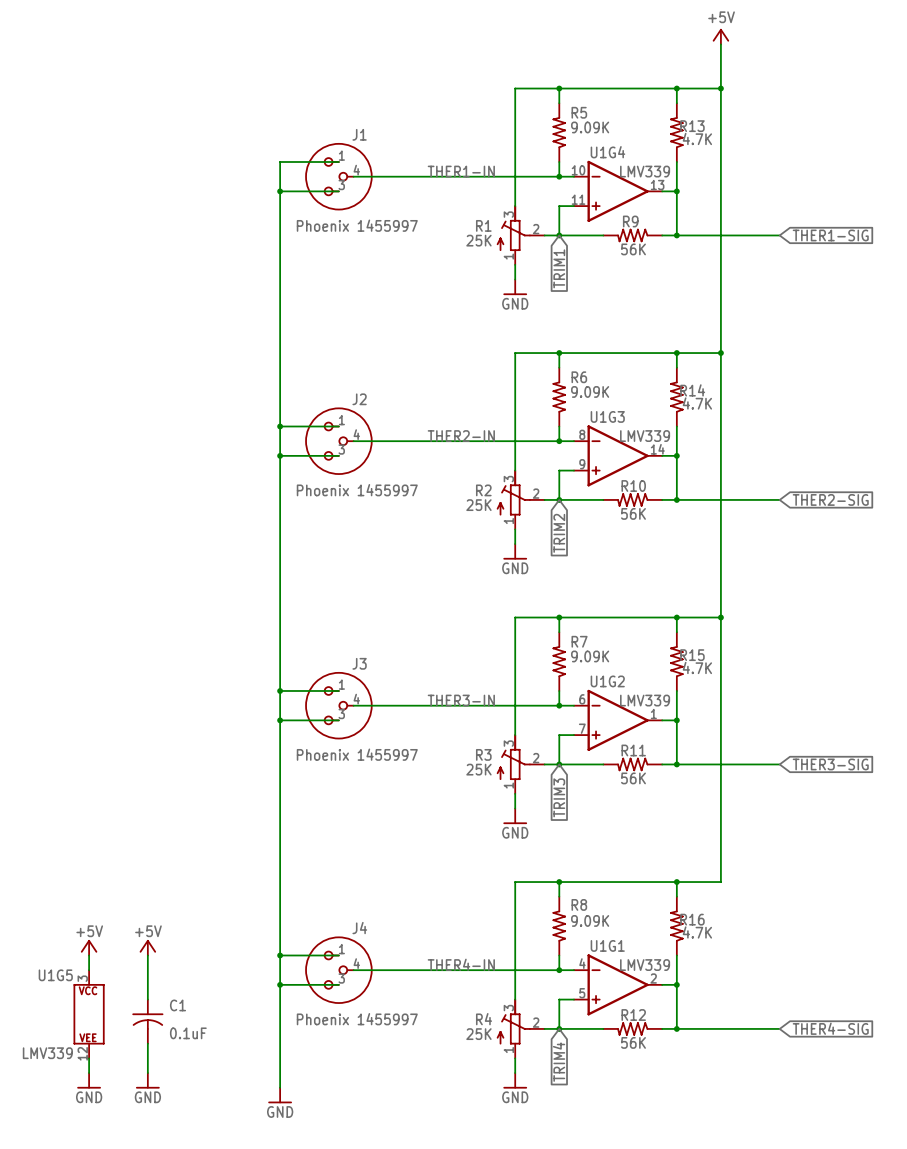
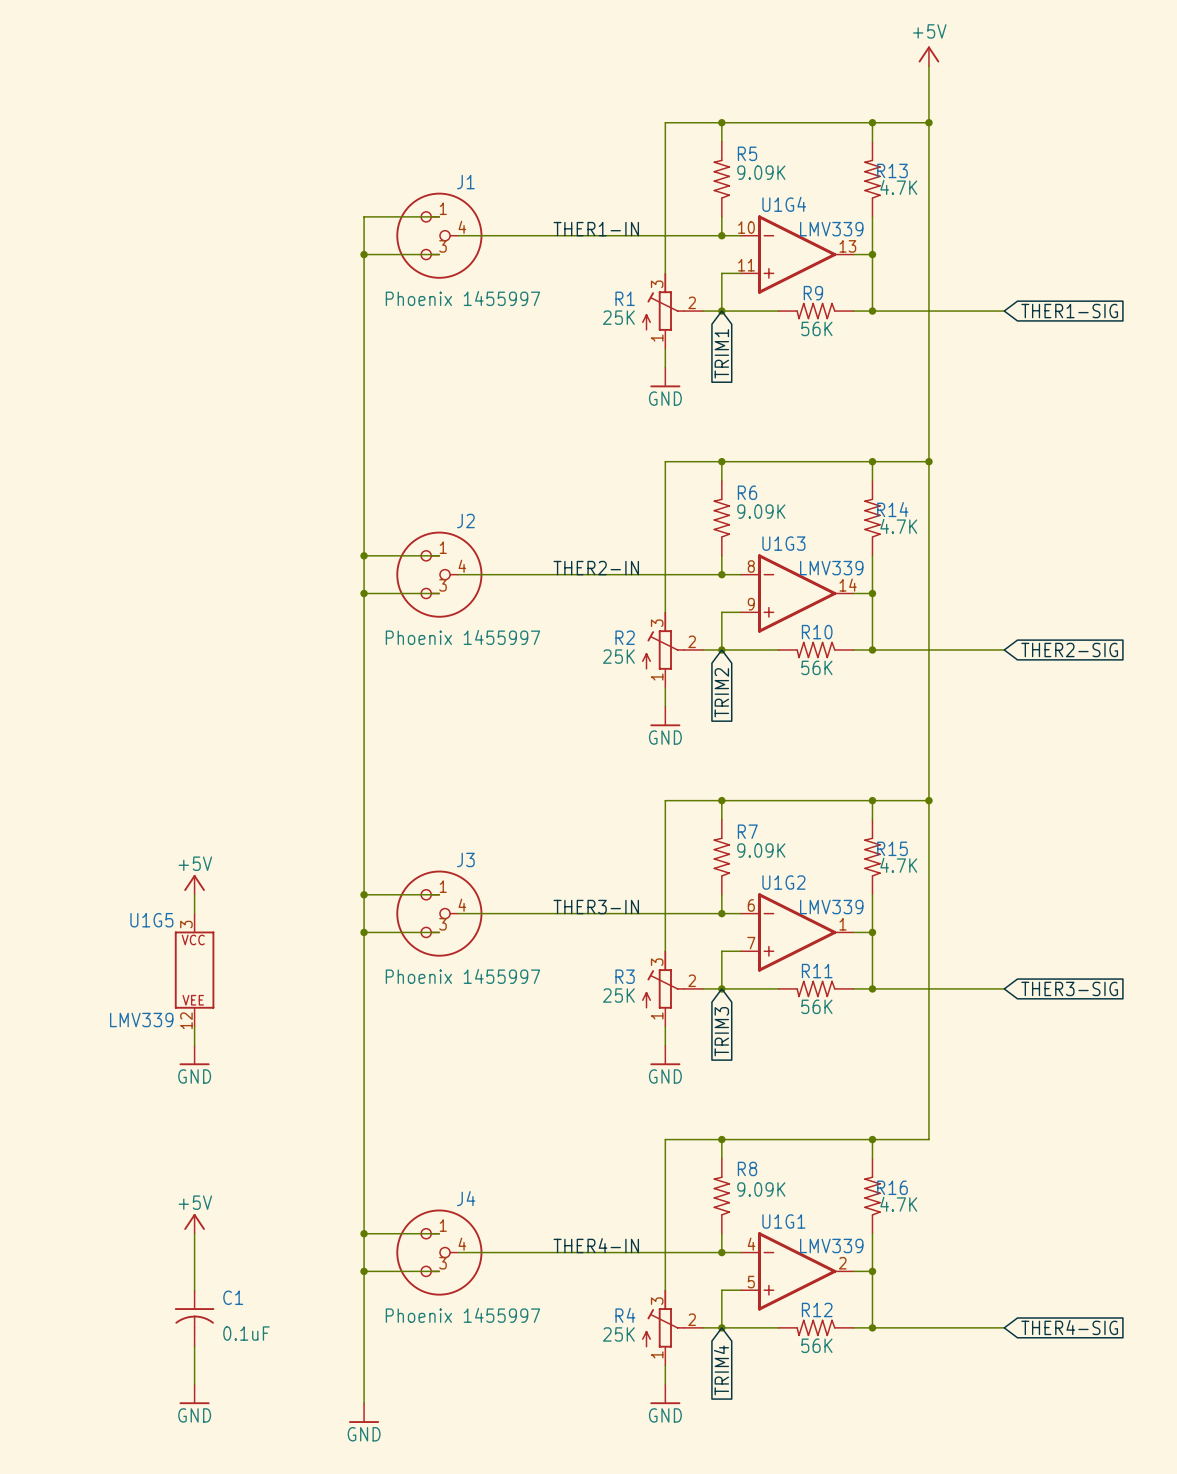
power symbol: none -> +5V (194, 884)
wire: none -> (194, 894) (194, 913)
wire: none -> (194, 1026) (194, 1045)
power symbol: none -> GND (194, 1055)
power symbol: +5V (89, 947) -> none
wire: (89, 955) (89, 970) -> none
U1G5 position: (89, 1014) -> (194, 970)
wire: (89, 1058) (89, 1073) -> none
power symbol: GND (89, 1080) -> none

